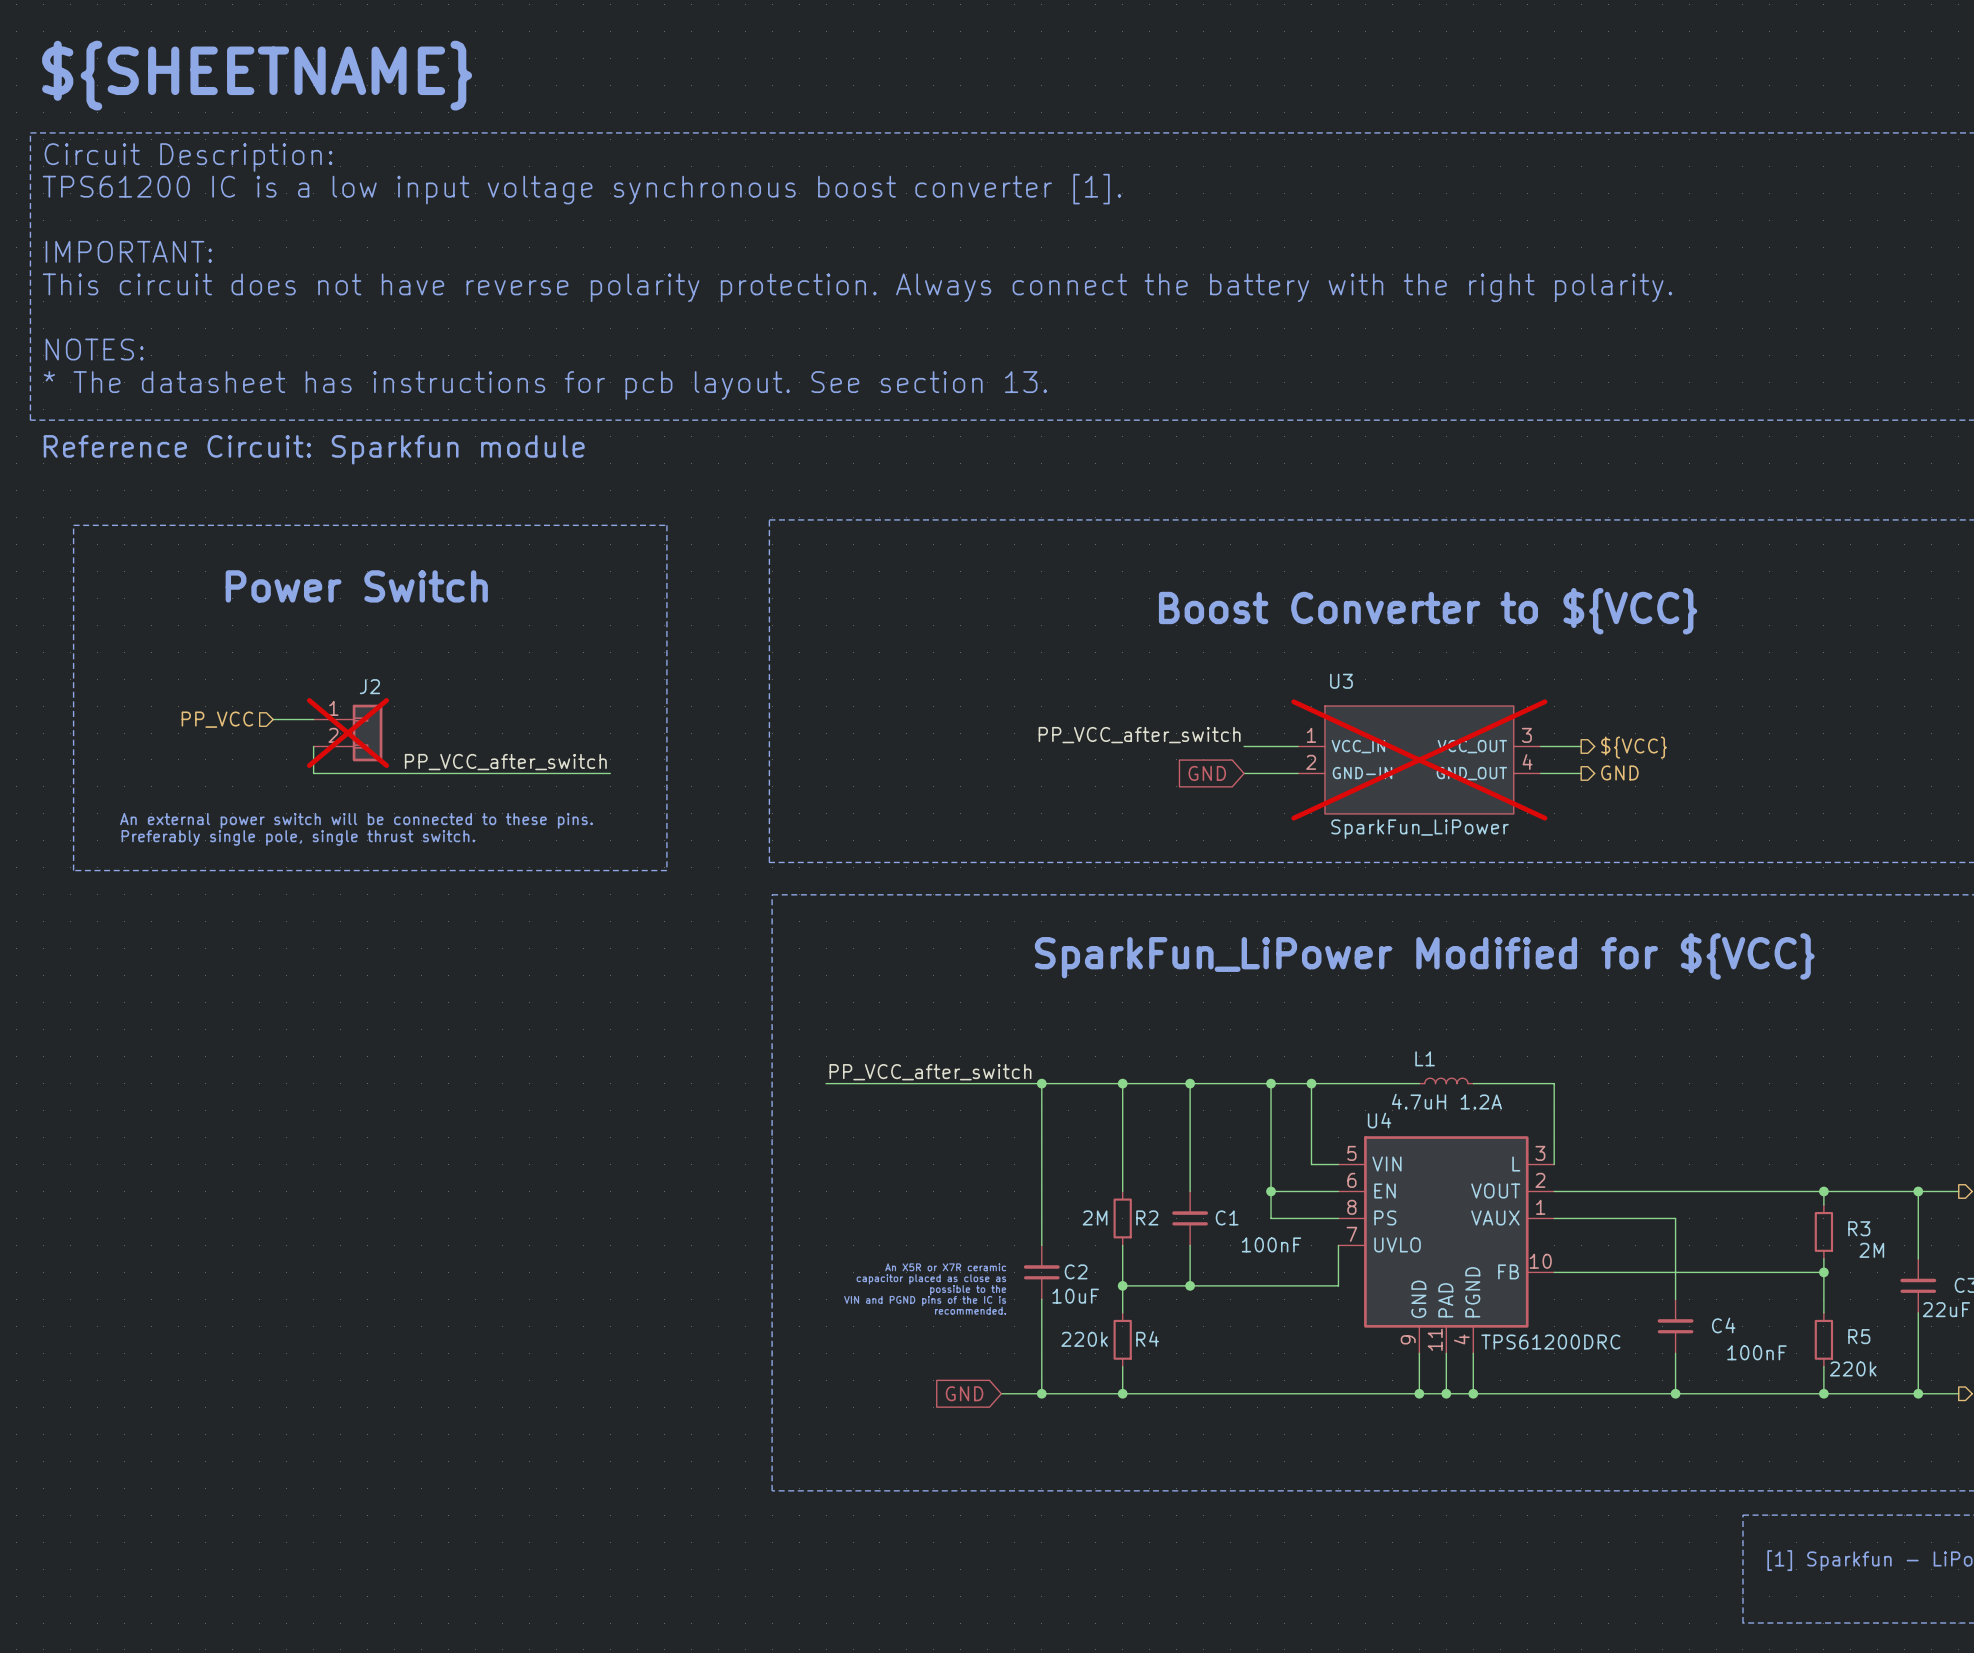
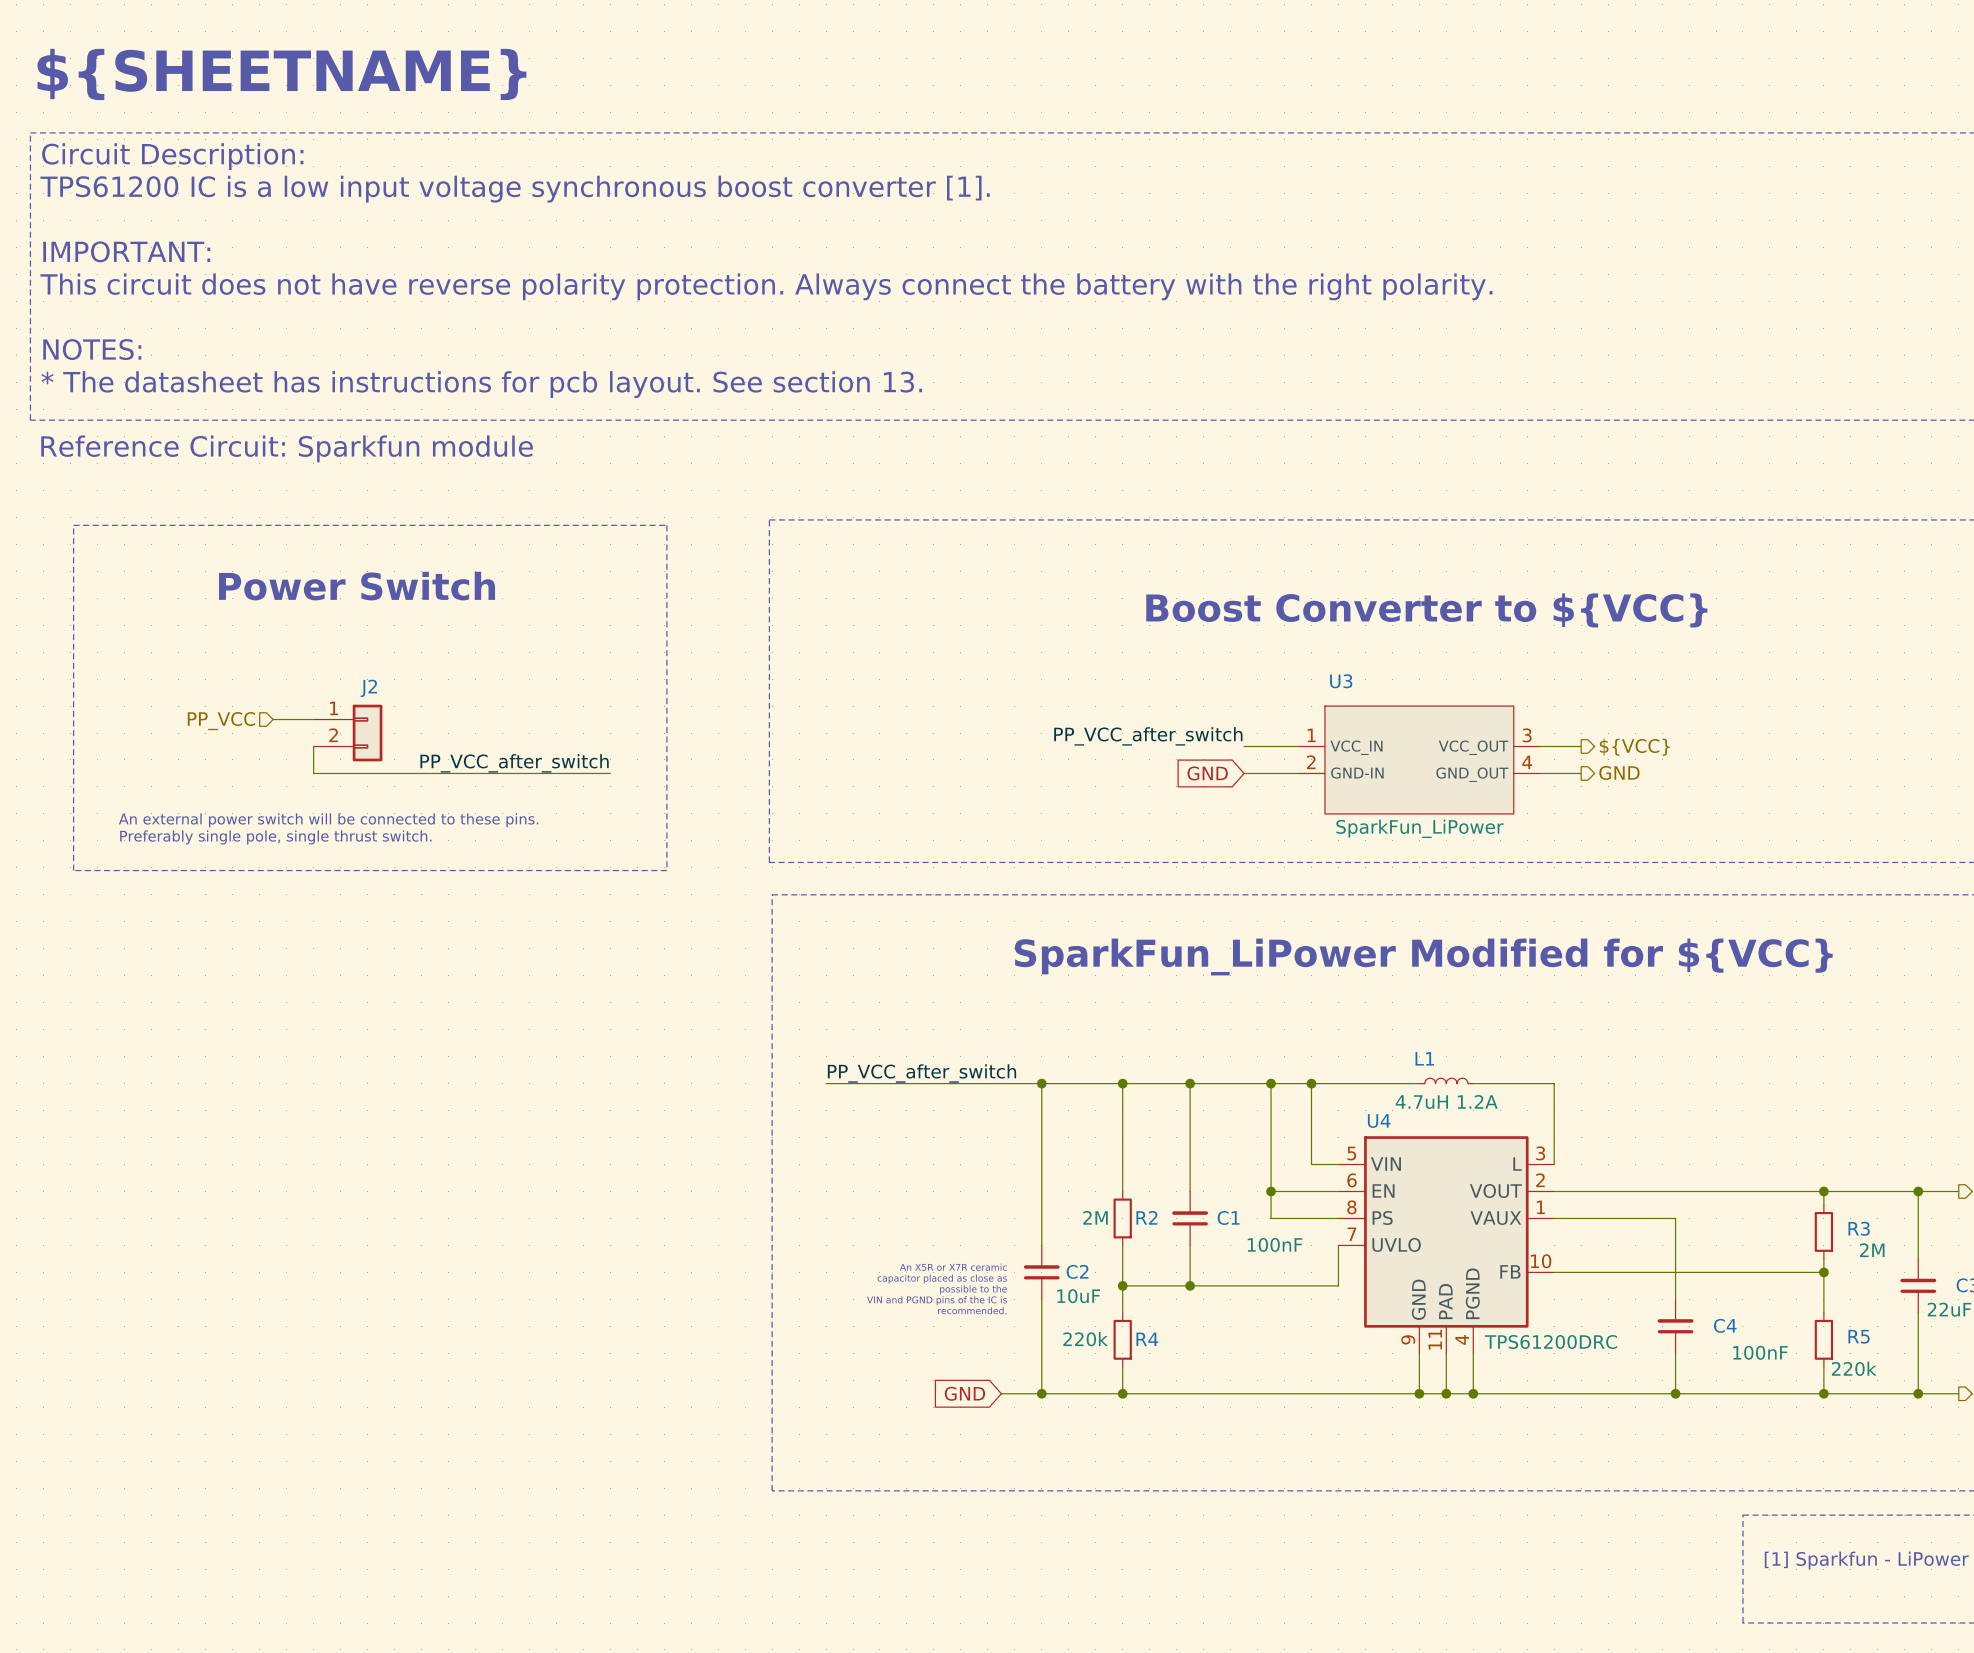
J2 do-not-place cross: (348, 733) -> none
U3 do-not-place cross: (1419, 759) -> none

